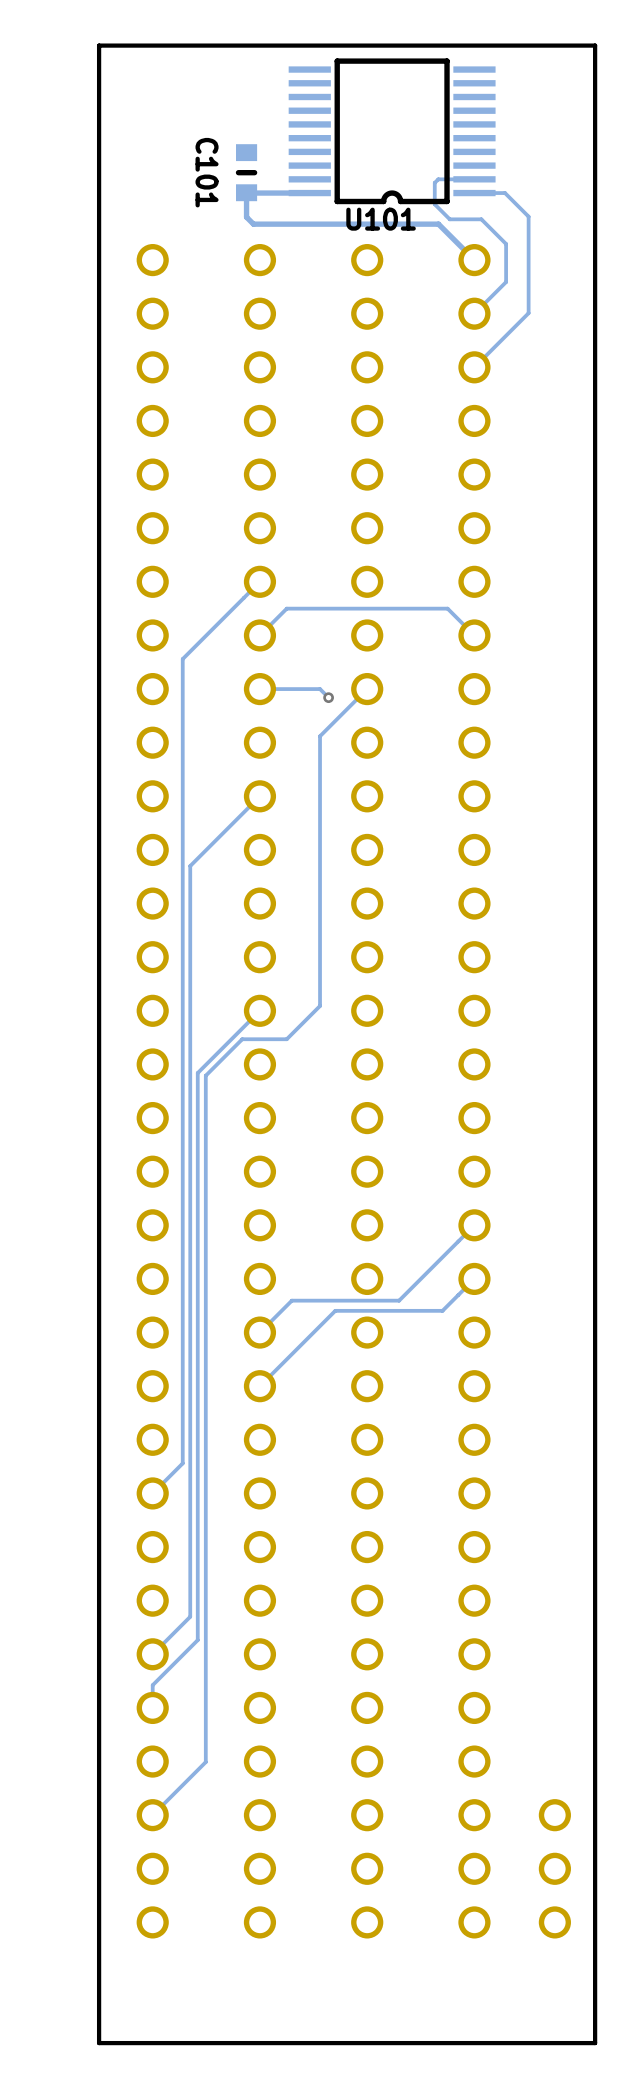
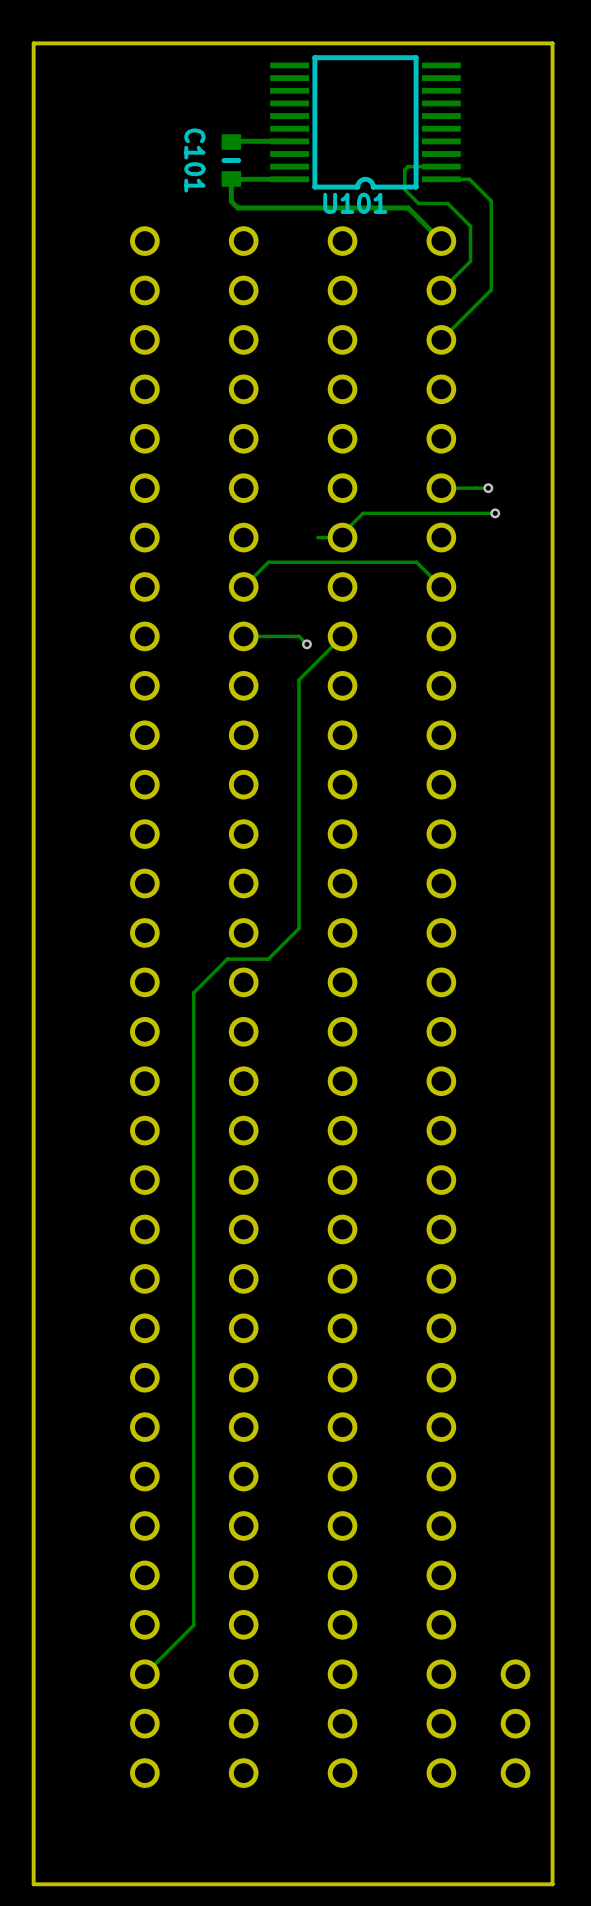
board edge: (99, 45) (99, 2043) -> (95, 43) (33, 43) (33, 1884) (95, 1884)
track: none -> (289, 141) (232, 141)
track: none -> (488, 488) (441, 488)
via: none -> (488, 488)
track: none -> (495, 513) (363, 513) (338, 537) (317, 537)
via: none -> (495, 513)
track: (259, 581) (182, 659) (182, 1463) (152, 1493) -> none
track: (259, 796) (190, 866) (190, 1616) (152, 1654) -> none
track: (259, 1010) (197, 1073) (197, 1640) (152, 1685) (152, 1707) -> none
track: (474, 1225) (399, 1300) (291, 1300) (259, 1332) -> none
track: (474, 1278) (442, 1310) (335, 1310) (259, 1386) -> none

